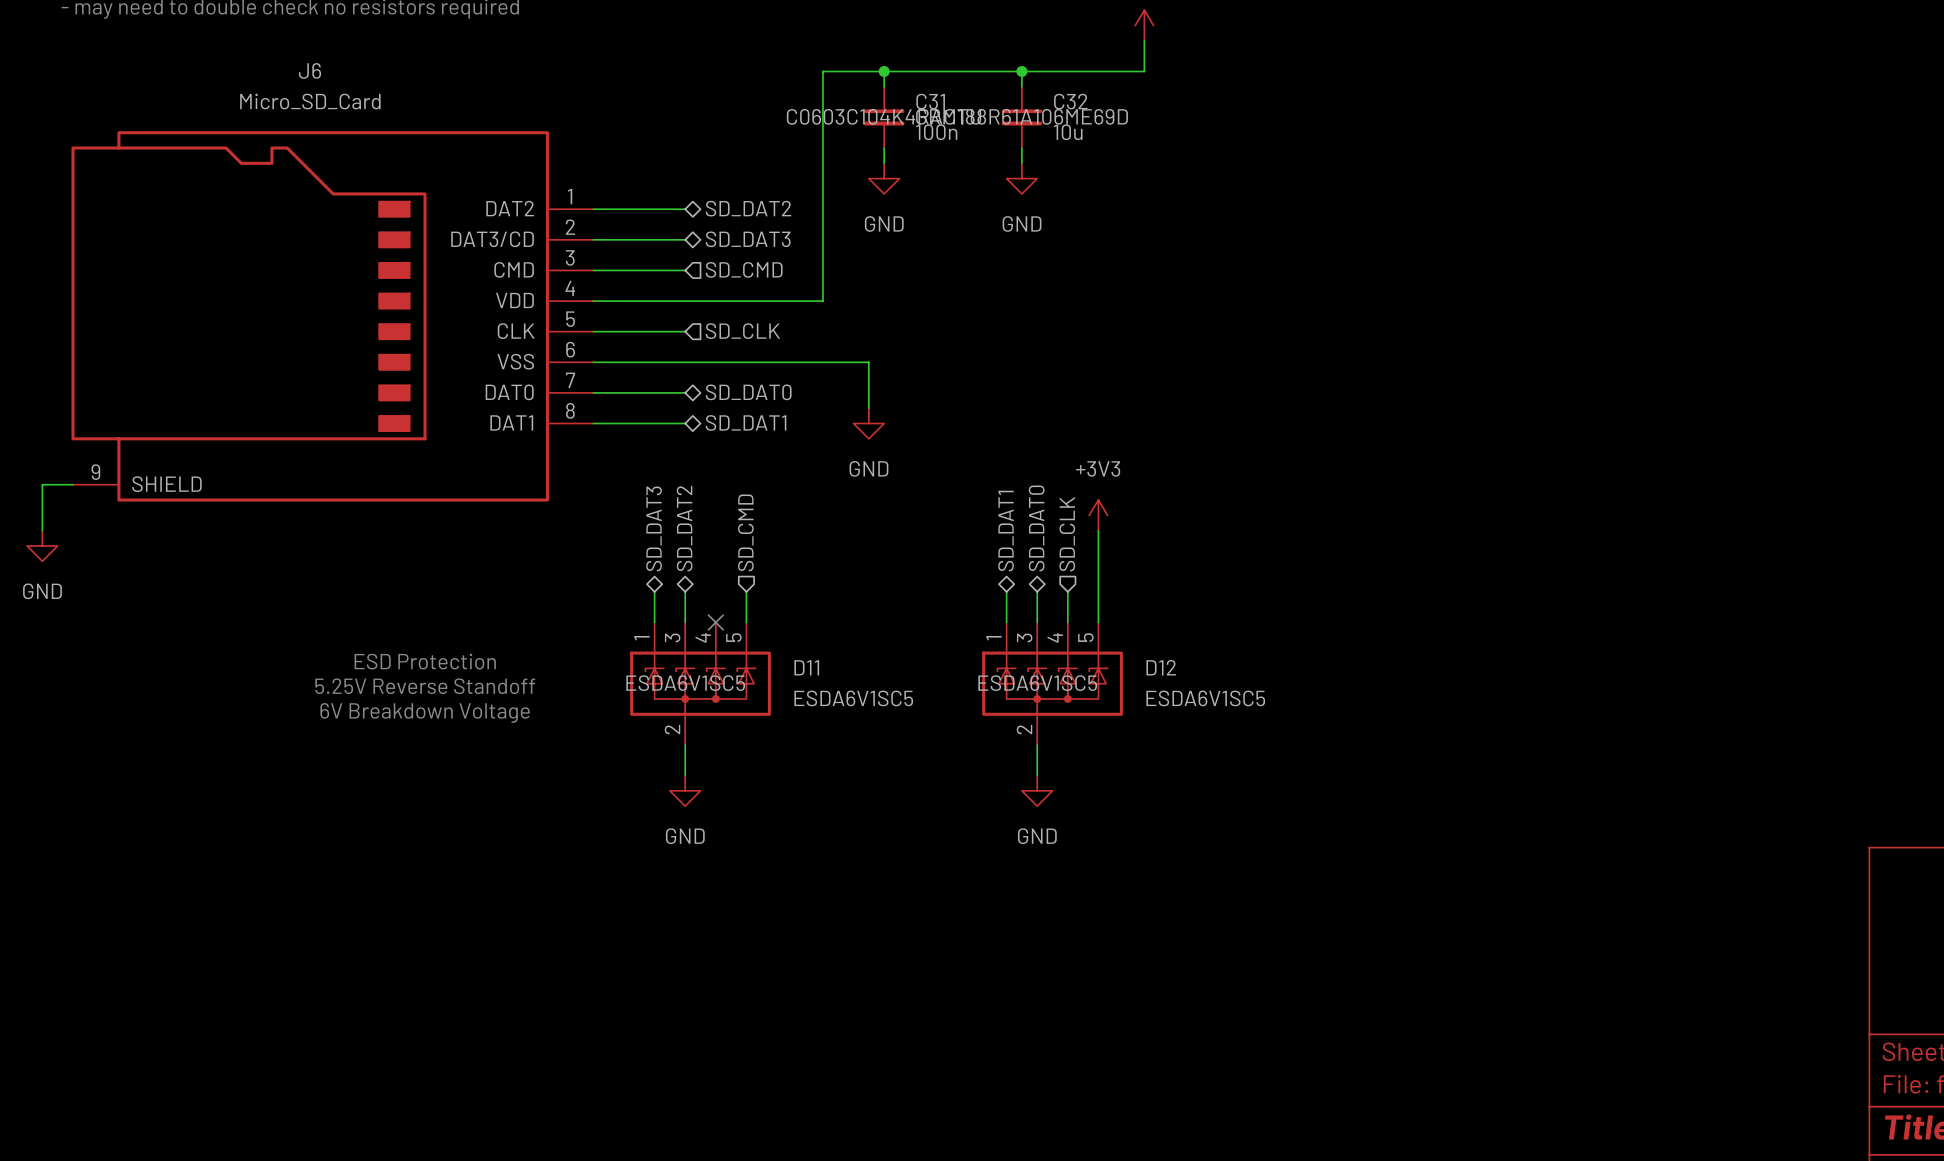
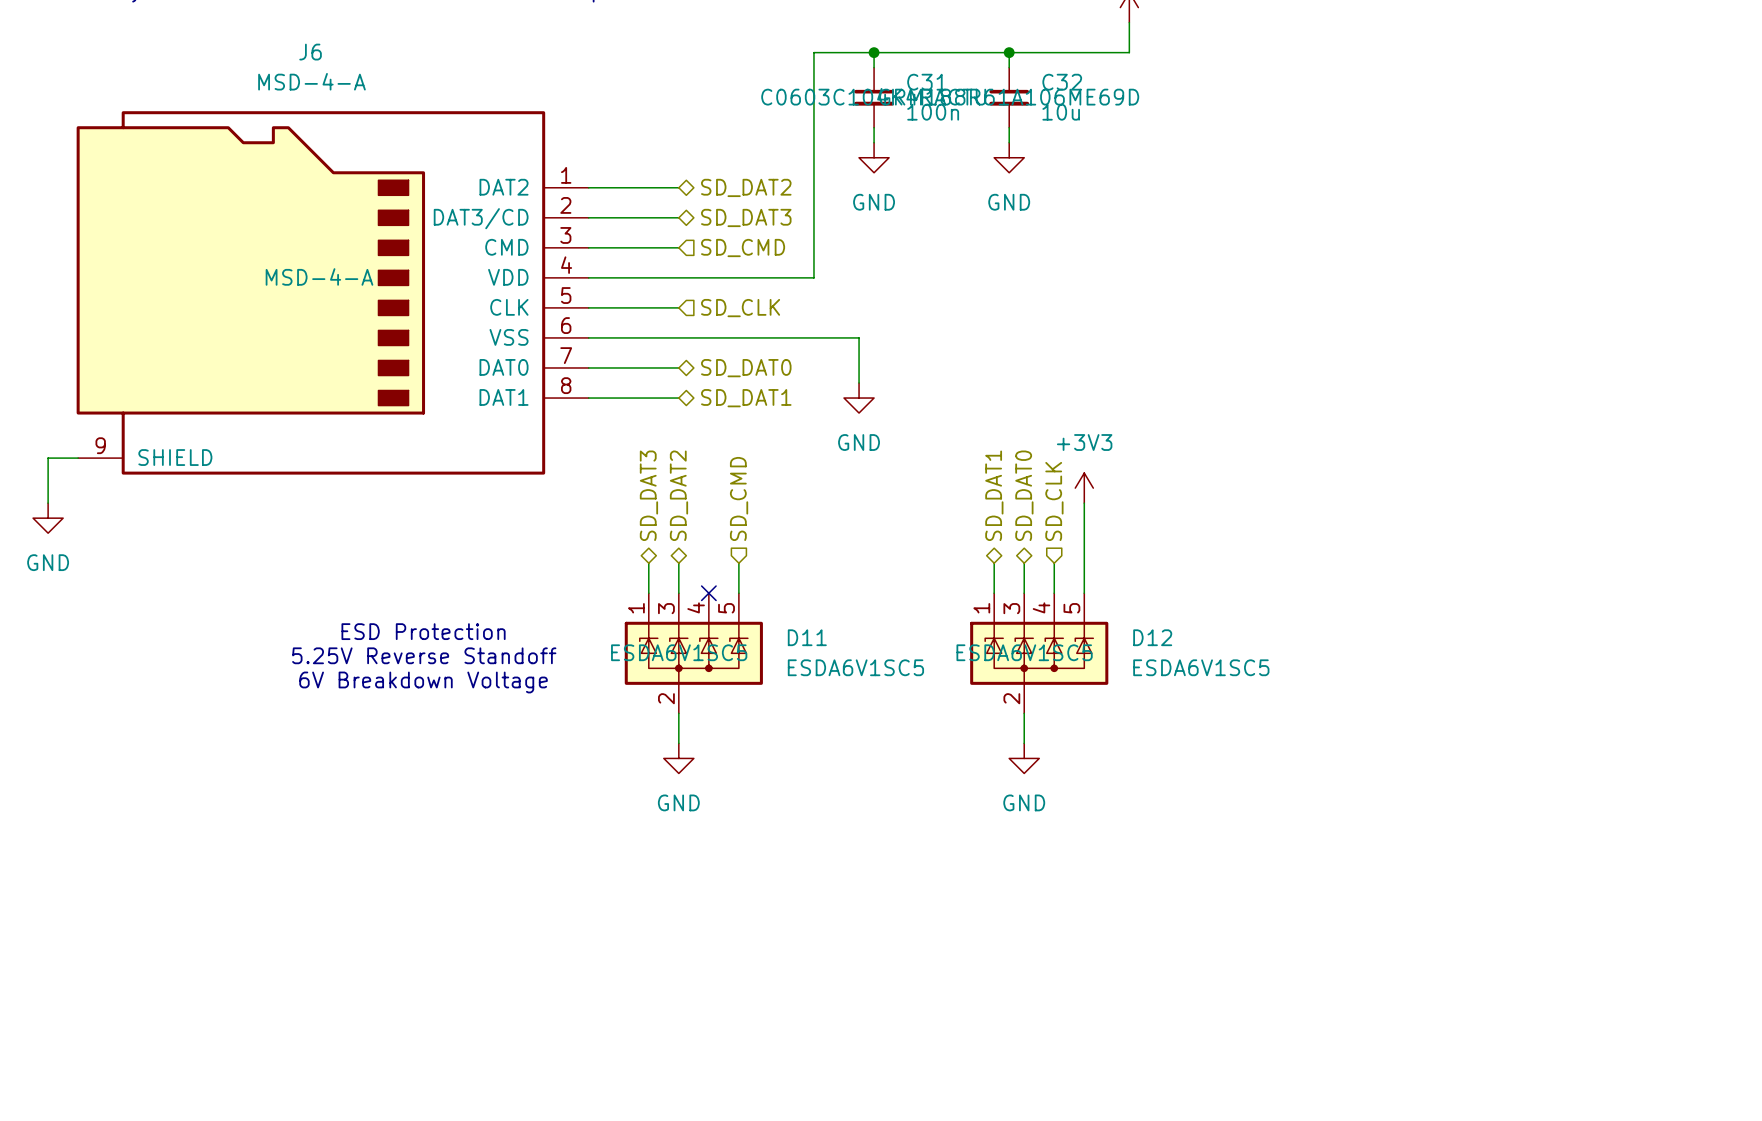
J6 value: Micro_SD_Card (310, 101) -> MSD-4-A (311, 81)
J6 text: none -> MSD-4-A (319, 276)

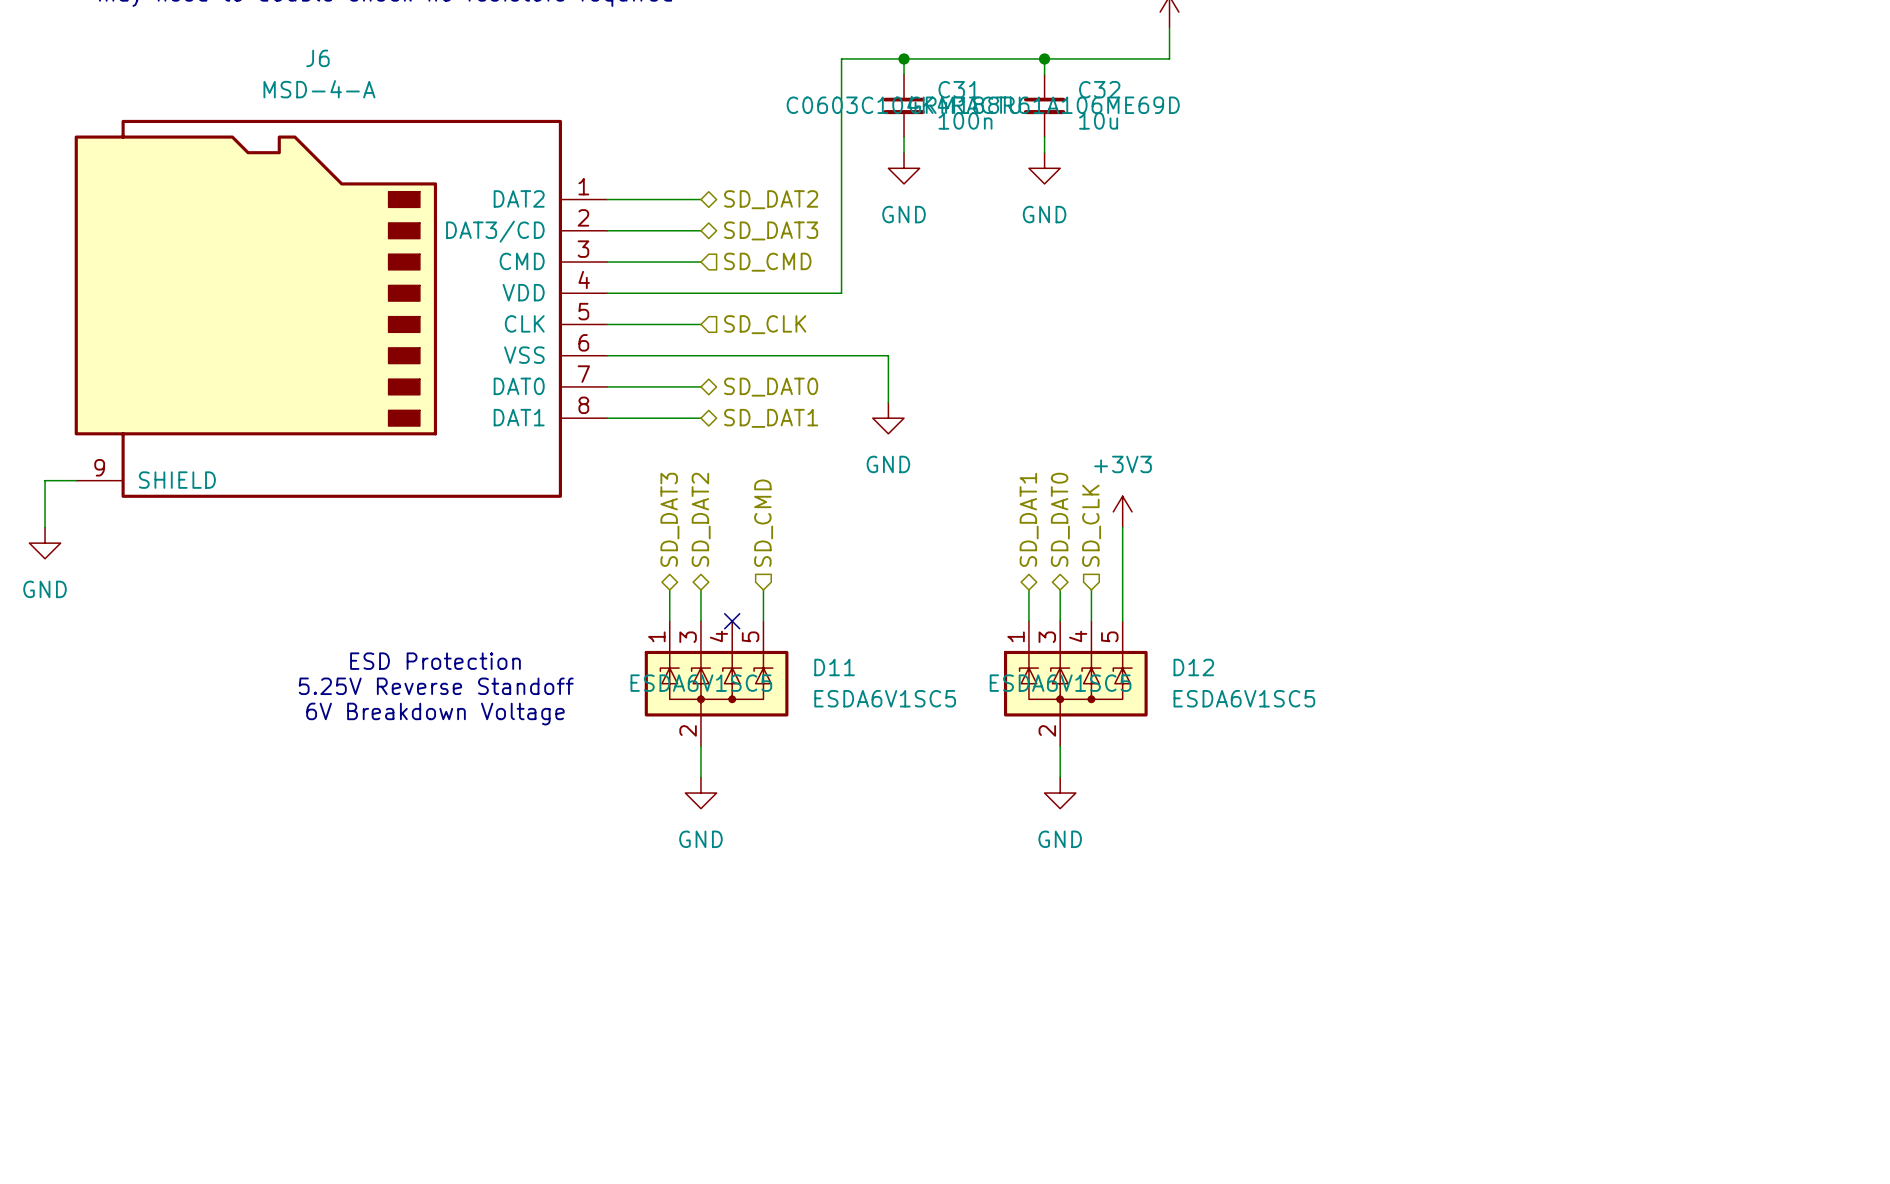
J6 text: MSD-4-A (319, 276) -> none

